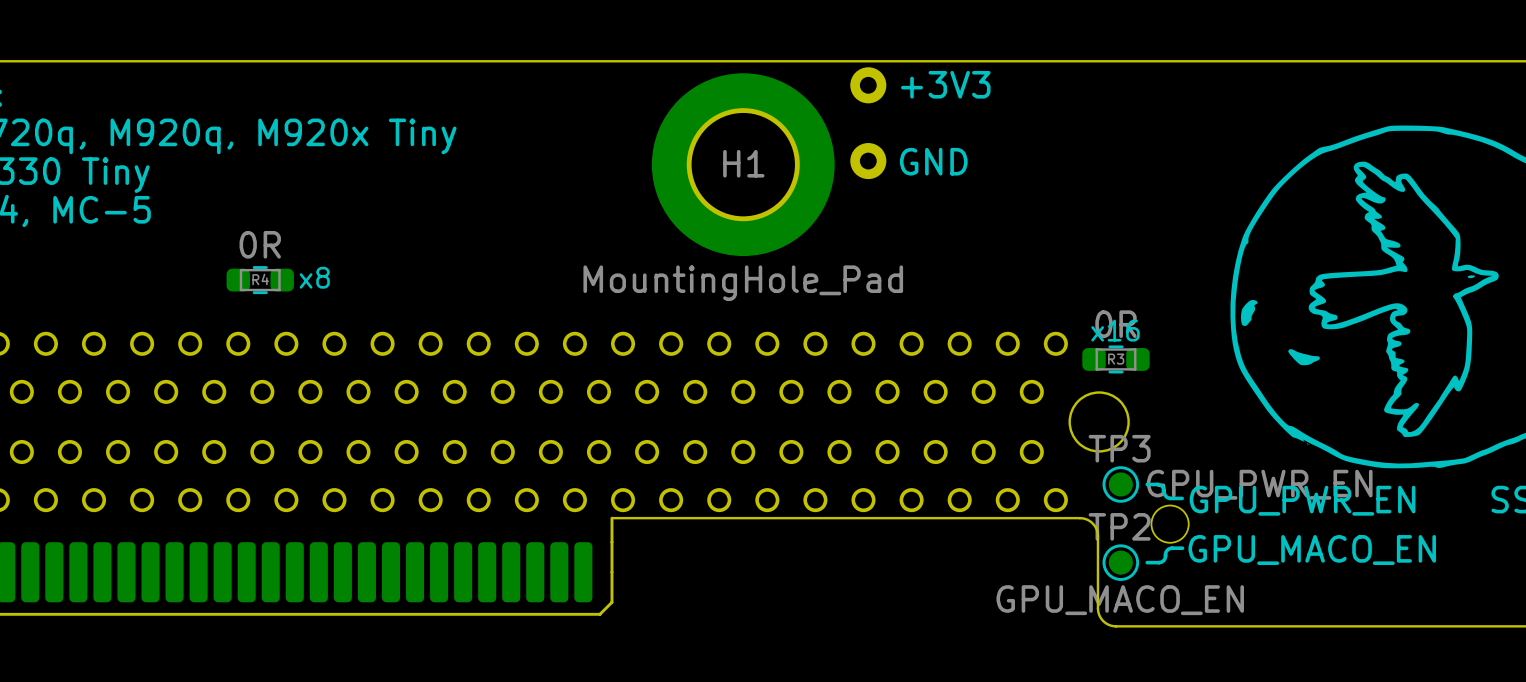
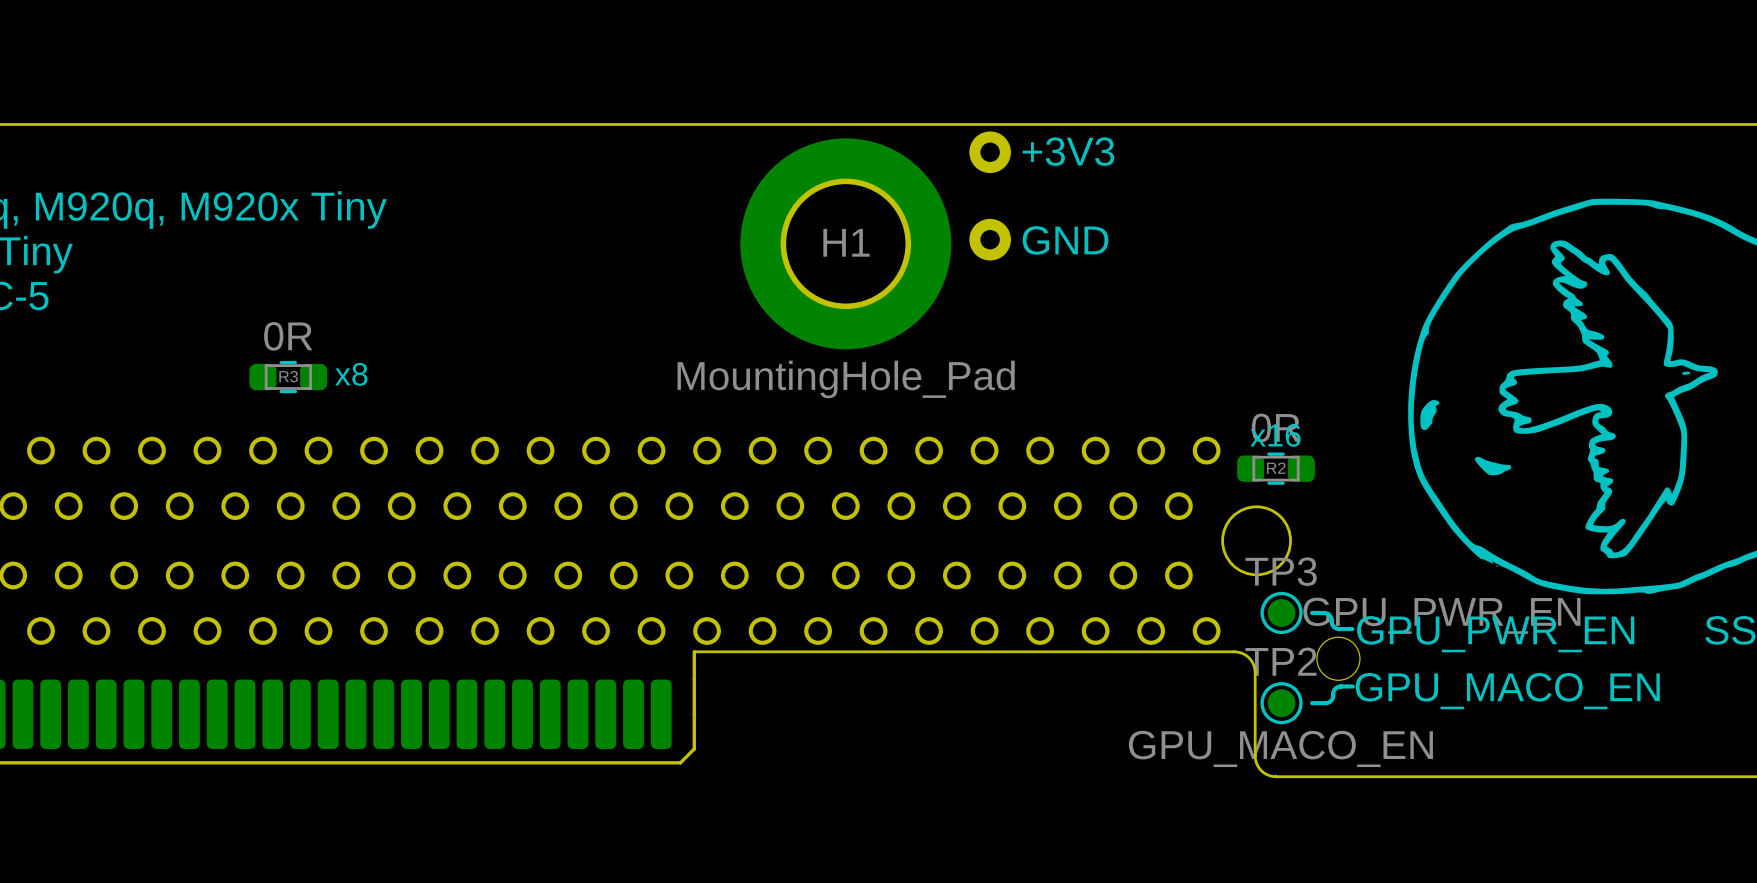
R4 name: R4 (260, 279) -> R3 (288, 376)
R3 name: R3 (1116, 359) -> R2 (1276, 468)

